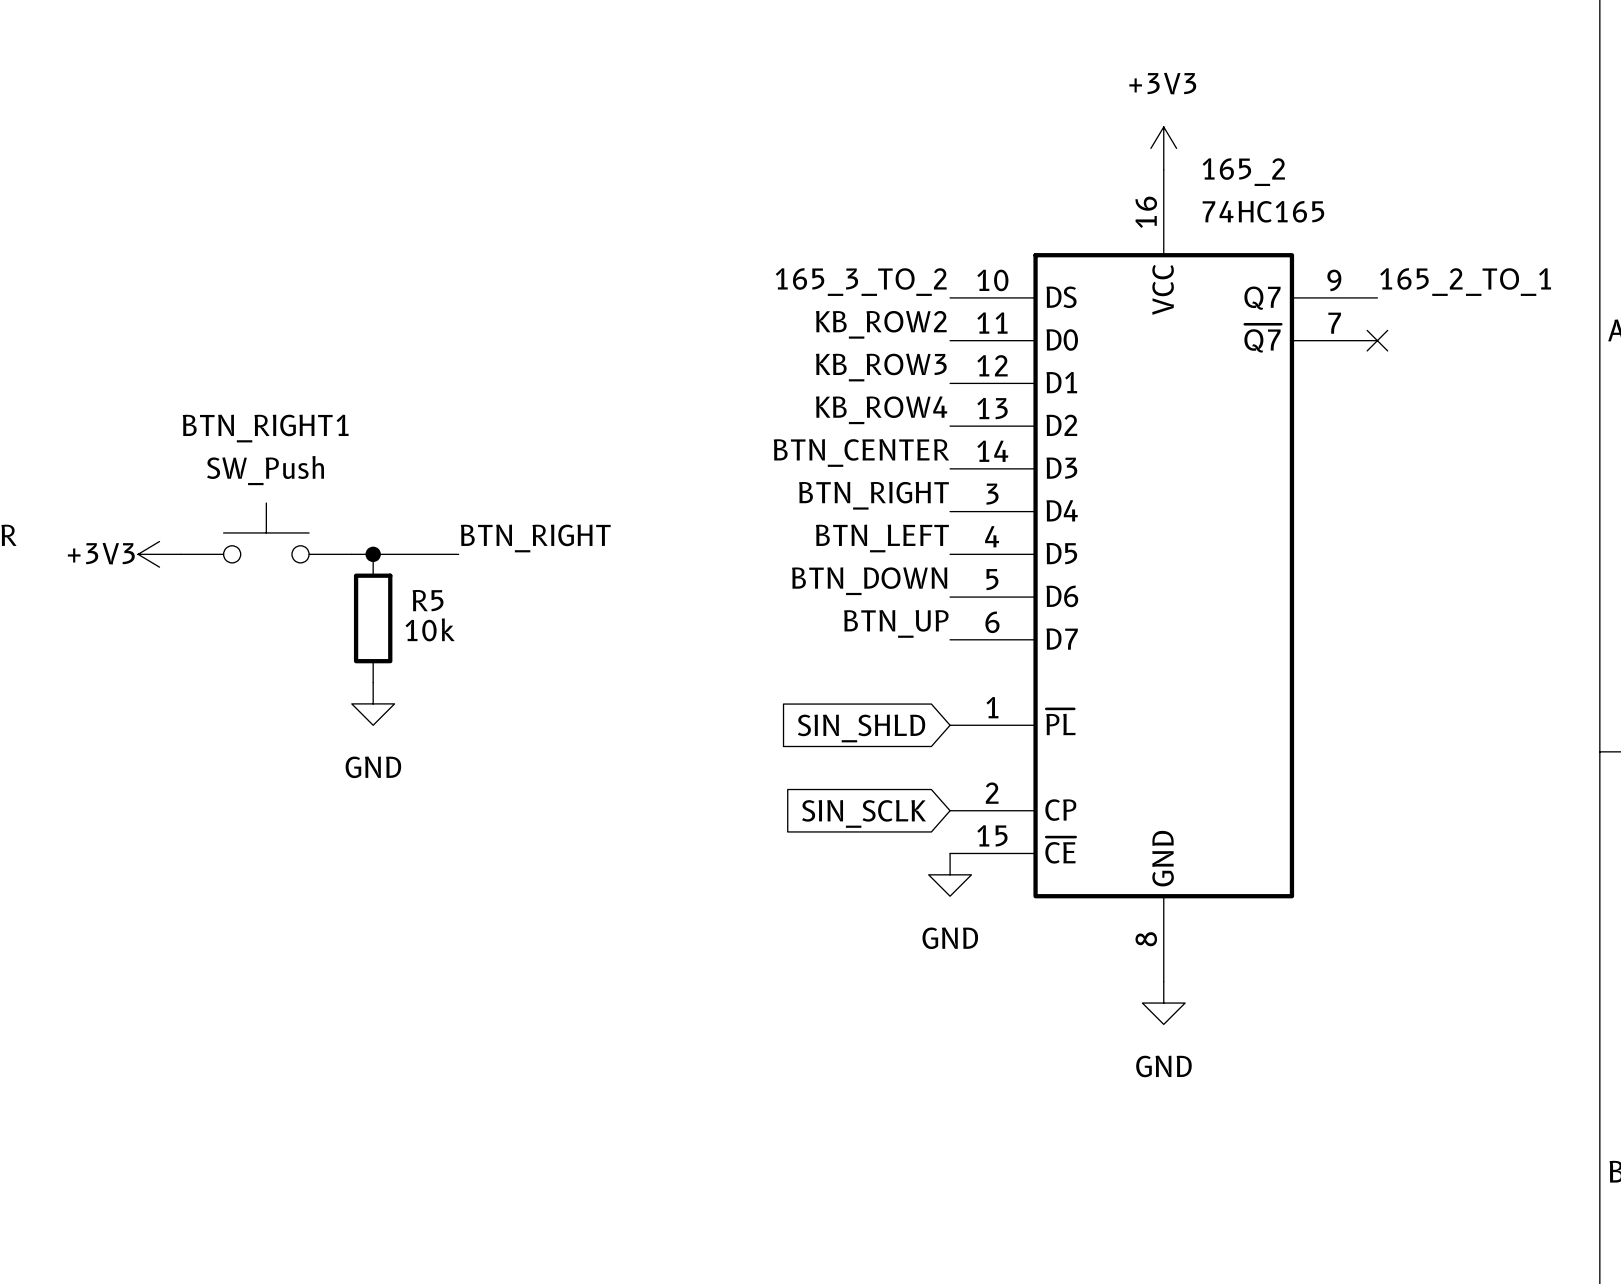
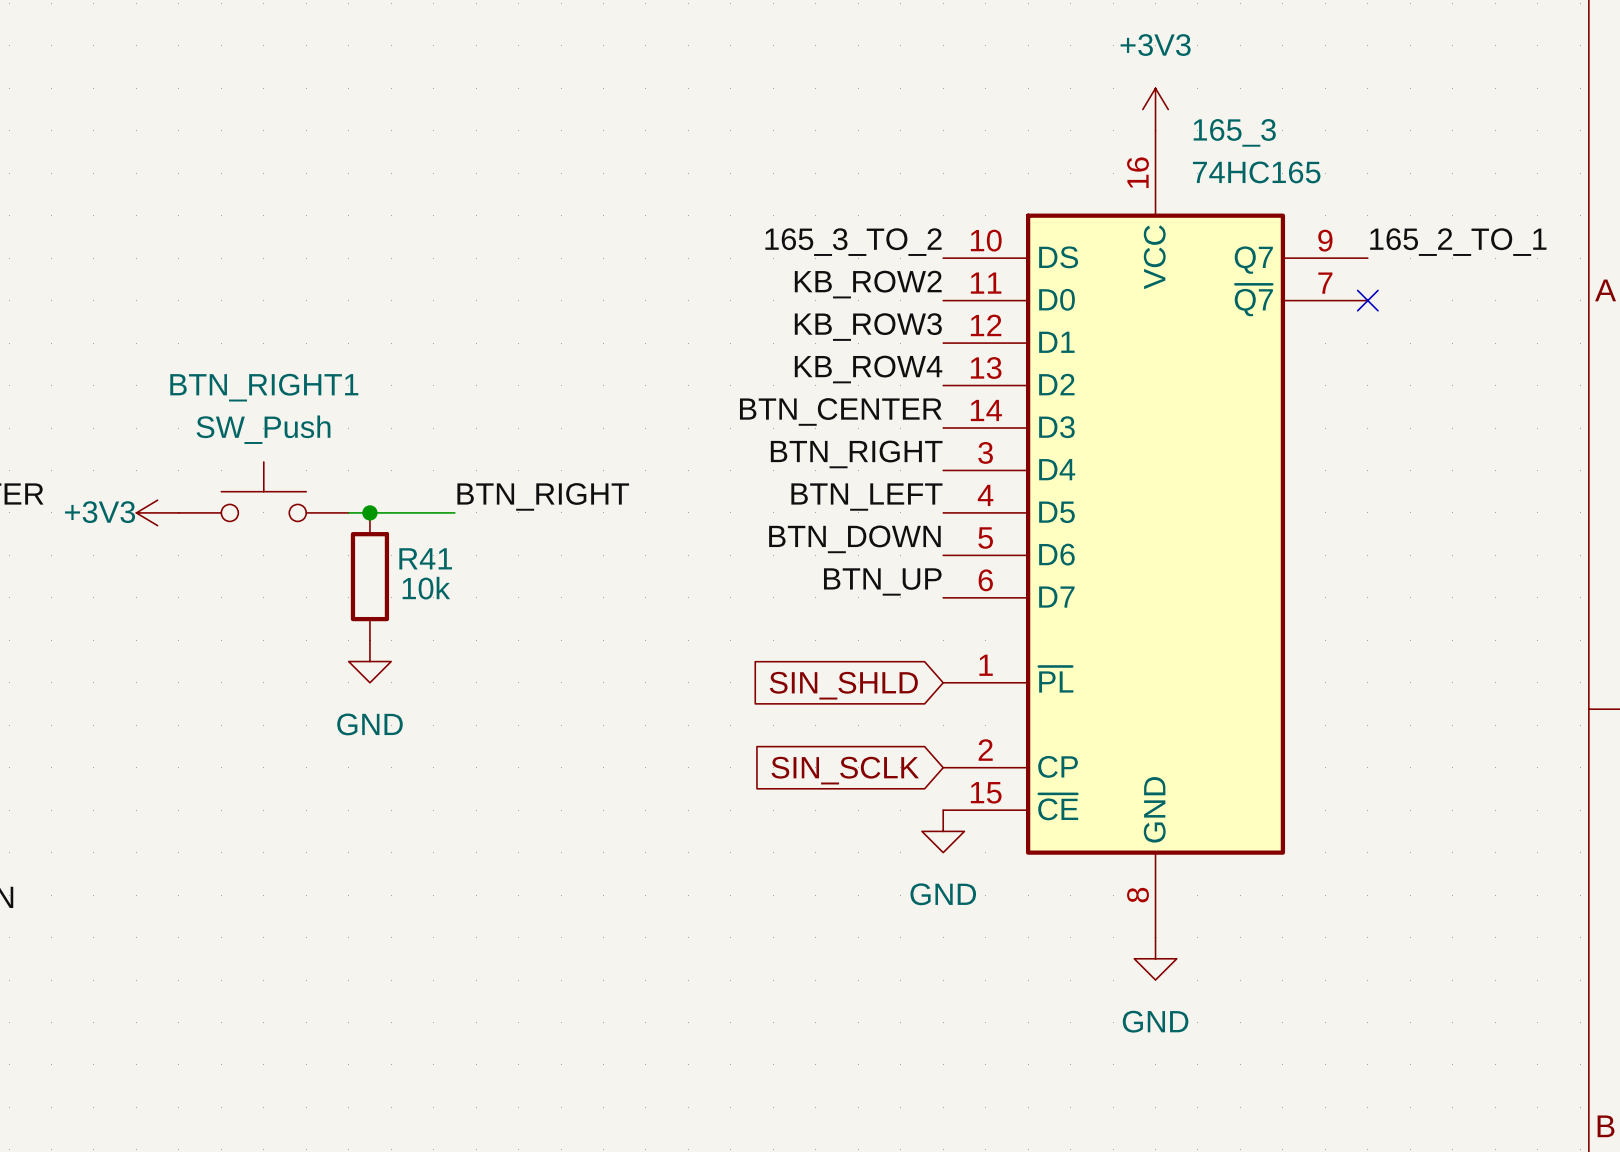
165_2 name: 165_2 (1243, 172) -> 165_3 (1234, 132)
R5 name: R5 (428, 600) -> R41 (425, 558)

